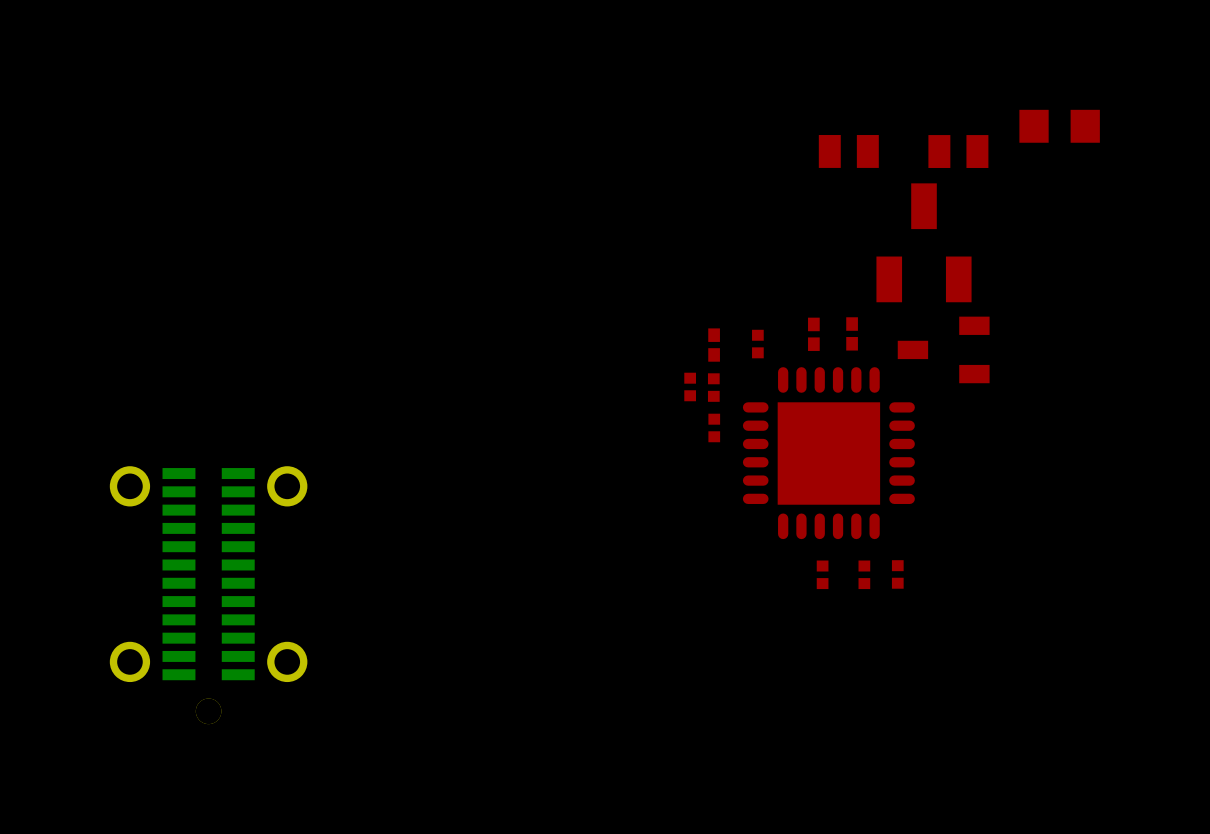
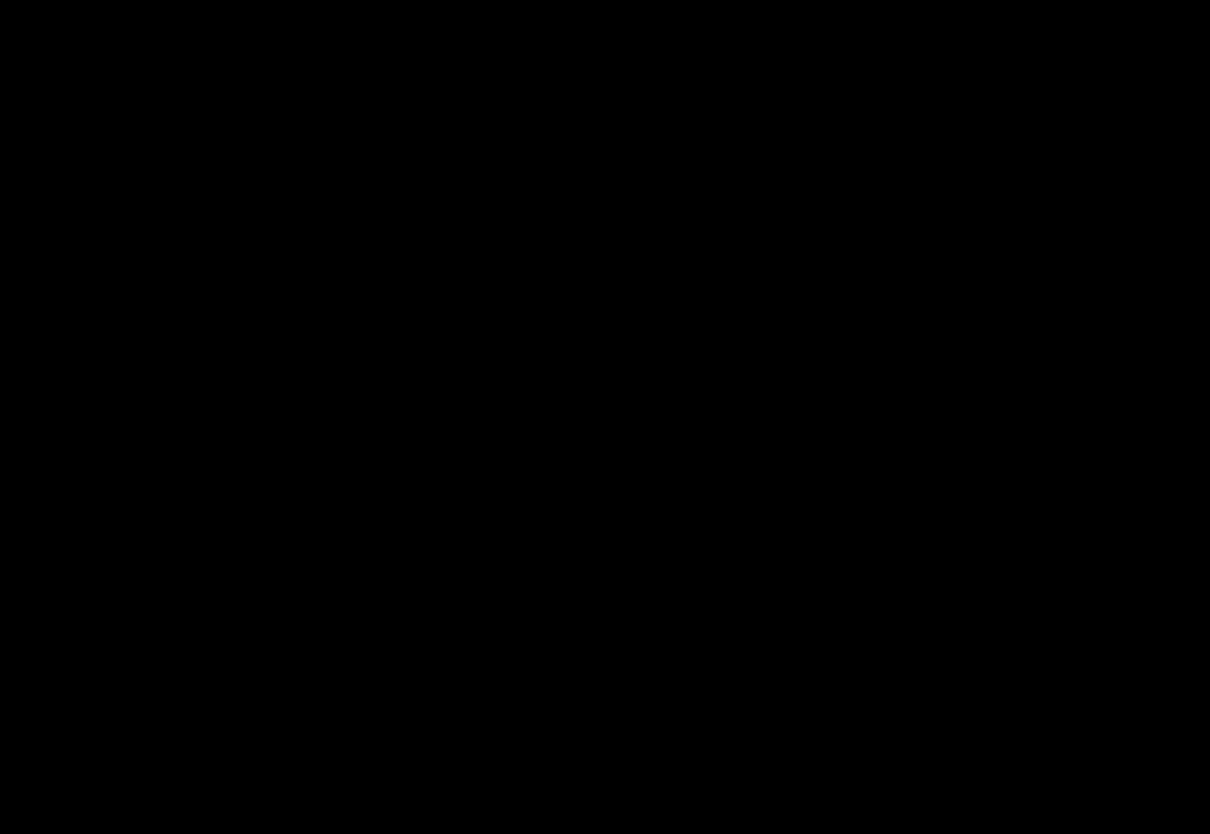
part: (1059, 126) -> none
part: (848, 151) -> none
part: (958, 151) -> none
part: (924, 242) -> none
part: (852, 333) -> none
part: (813, 334) -> none
part: (757, 344) -> none
part: (714, 345) -> none
part: (943, 349) -> none
part: (690, 386) -> none
part: (713, 387) -> none
part: (714, 427) -> none
part: (828, 453) -> none
part: (822, 574) -> none
part: (864, 574) -> none
part: (897, 574) -> none
part: (208, 595) -> none

